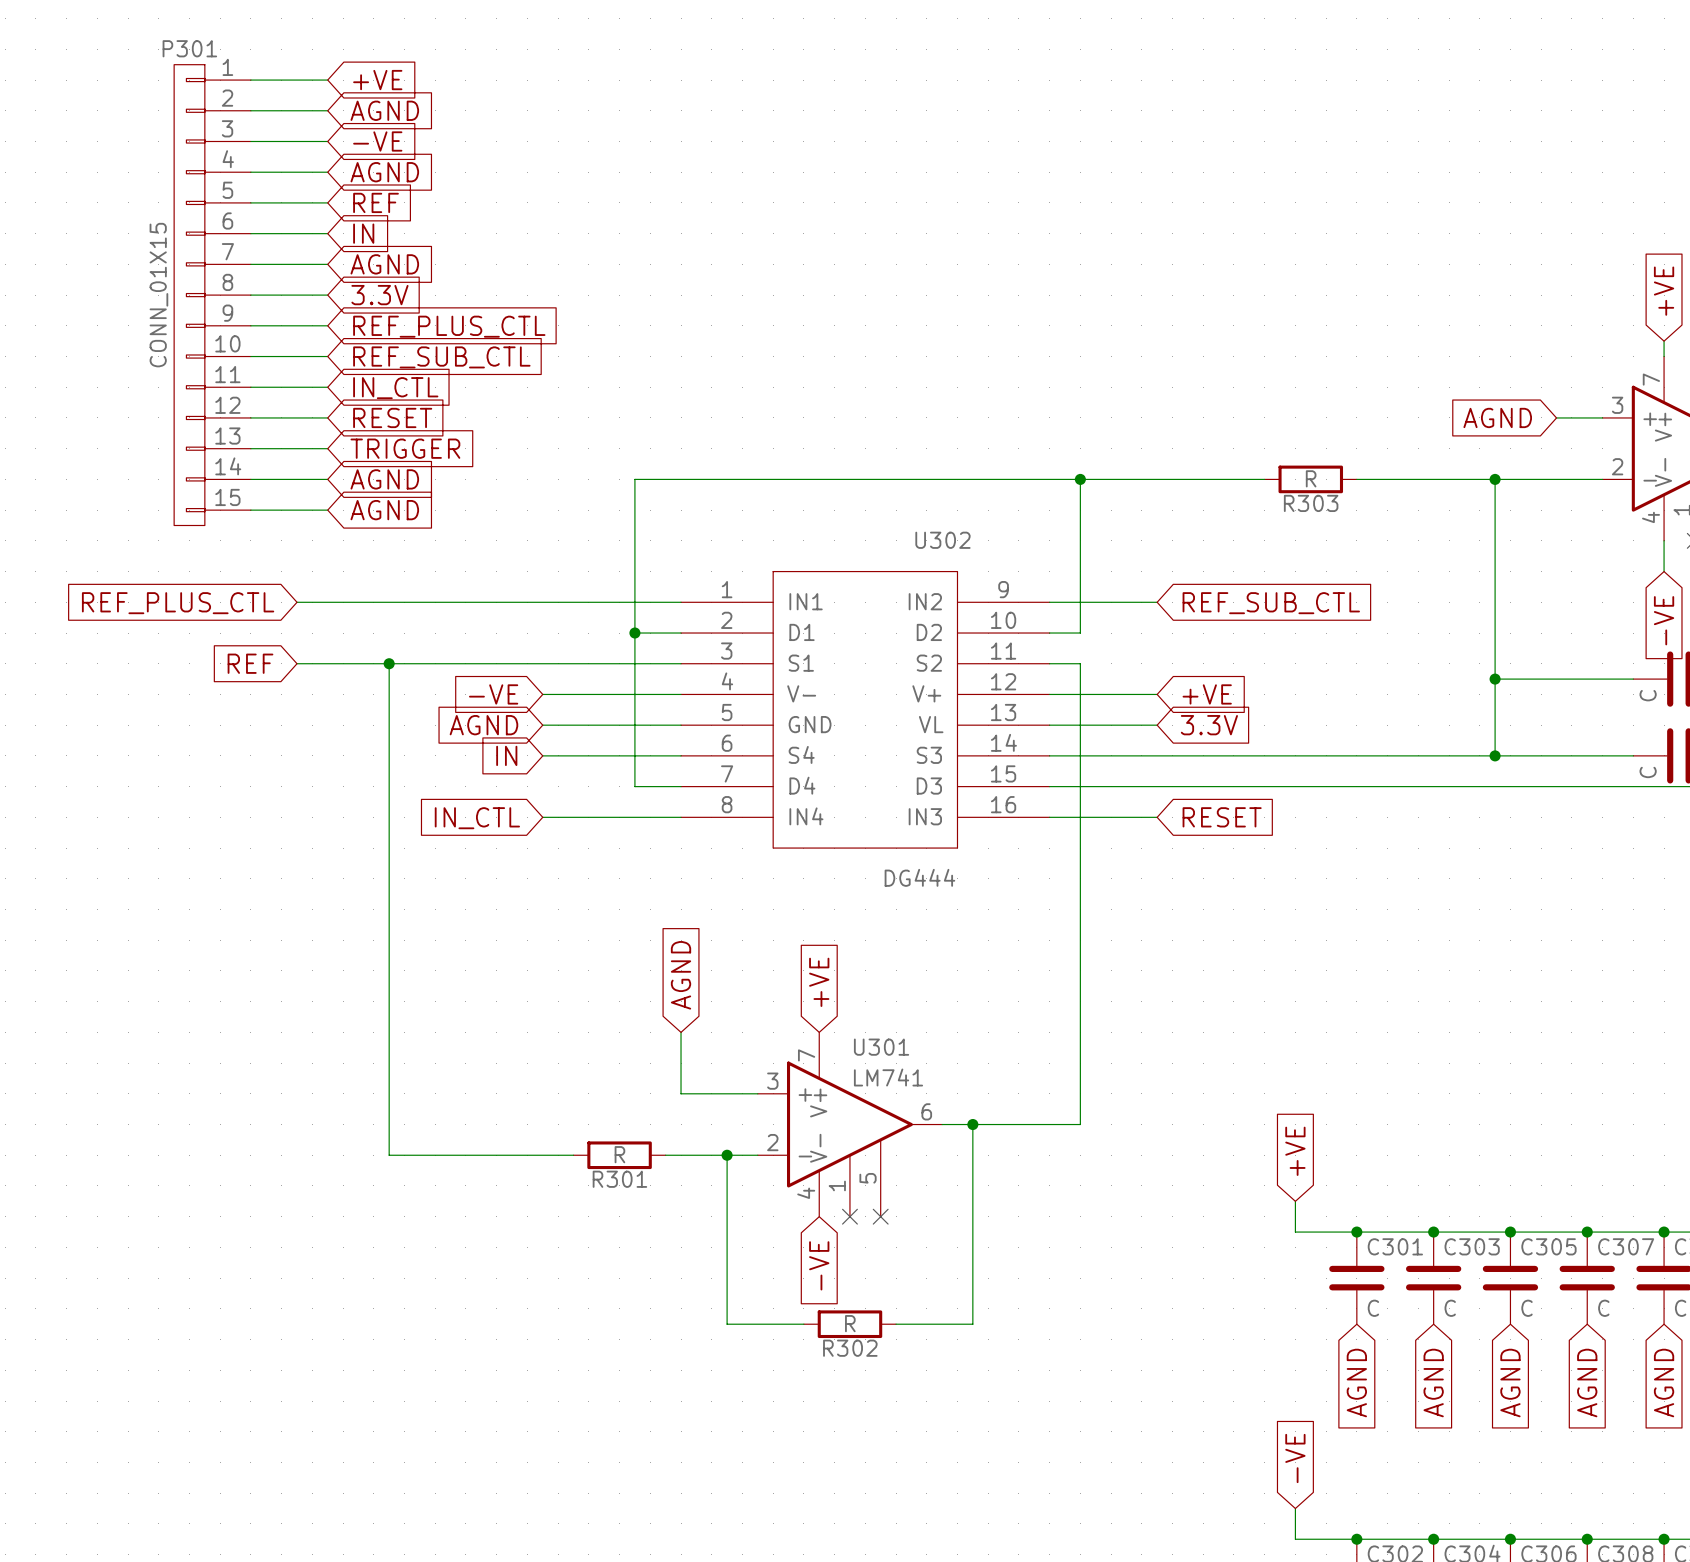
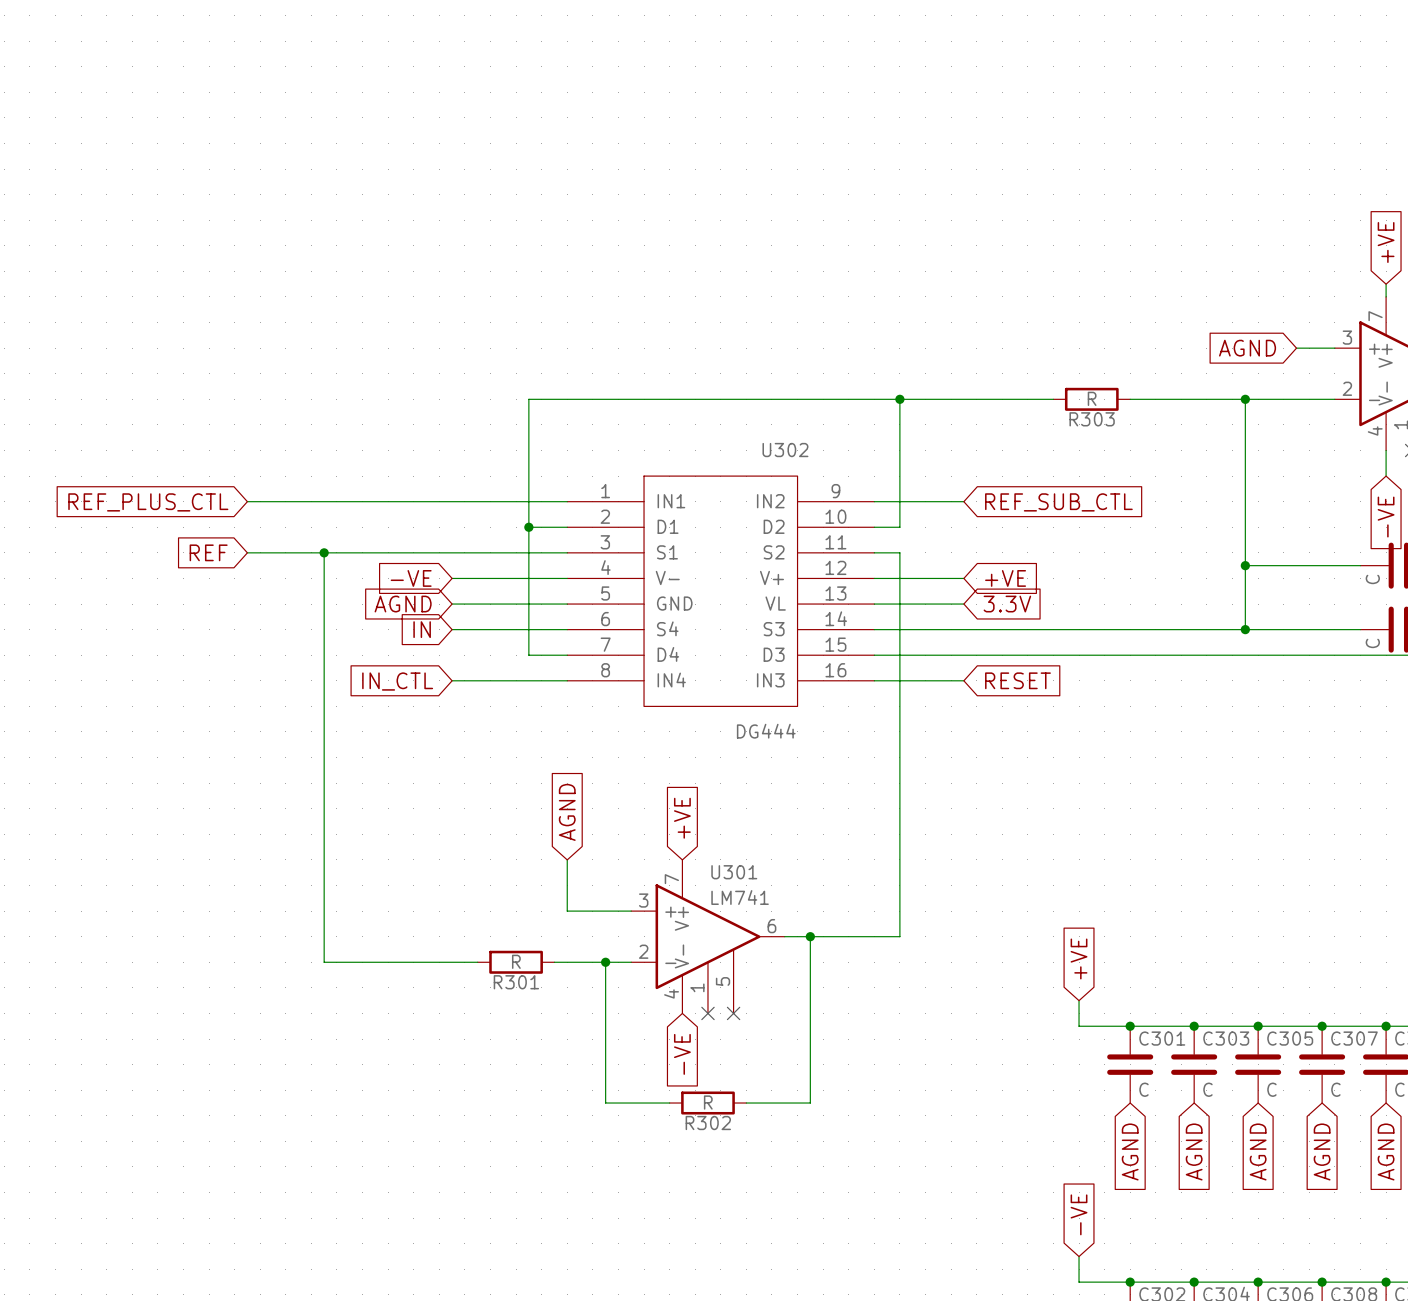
wire: (250, 80) (327, 80) -> none
global label: +VE (377, 80) -> none
wire: (250, 110) (327, 110) -> none
global label: AGND (384, 110) -> none
wire: (250, 141) (327, 141) -> none
global label: -VE (377, 141) -> none
wire: (250, 172) (327, 172) -> none
global label: AGND (384, 172) -> none
wire: (250, 202) (327, 202) -> none
global label: REF (376, 202) -> none
wire: (250, 233) (327, 233) -> none
global label: IN (363, 233) -> none
wire: (250, 264) (327, 264) -> none
global label: AGND (384, 264) -> none
P301: CONN_01X15 (212, 295) -> none
wire: (250, 295) (327, 295) -> none
global label: 3.3V (379, 295) -> none
wire: (250, 325) (327, 325) -> none
global label: REF_PLUS_CTL (449, 326) -> none
wire: (250, 356) (327, 356) -> none
global label: REF_SUB_CTL (441, 357) -> none
wire: (250, 387) (327, 387) -> none
global label: IN_CTL (395, 388) -> none
wire: (250, 417) (327, 417) -> none
global label: RESET (392, 417) -> none
wire: (250, 448) (327, 448) -> none
global label: TRIGGER (405, 448) -> none
wire: (250, 479) (327, 479) -> none
global label: AGND (384, 479) -> none
wire: (250, 510) (327, 510) -> none
global label: AGND (384, 510) -> none

